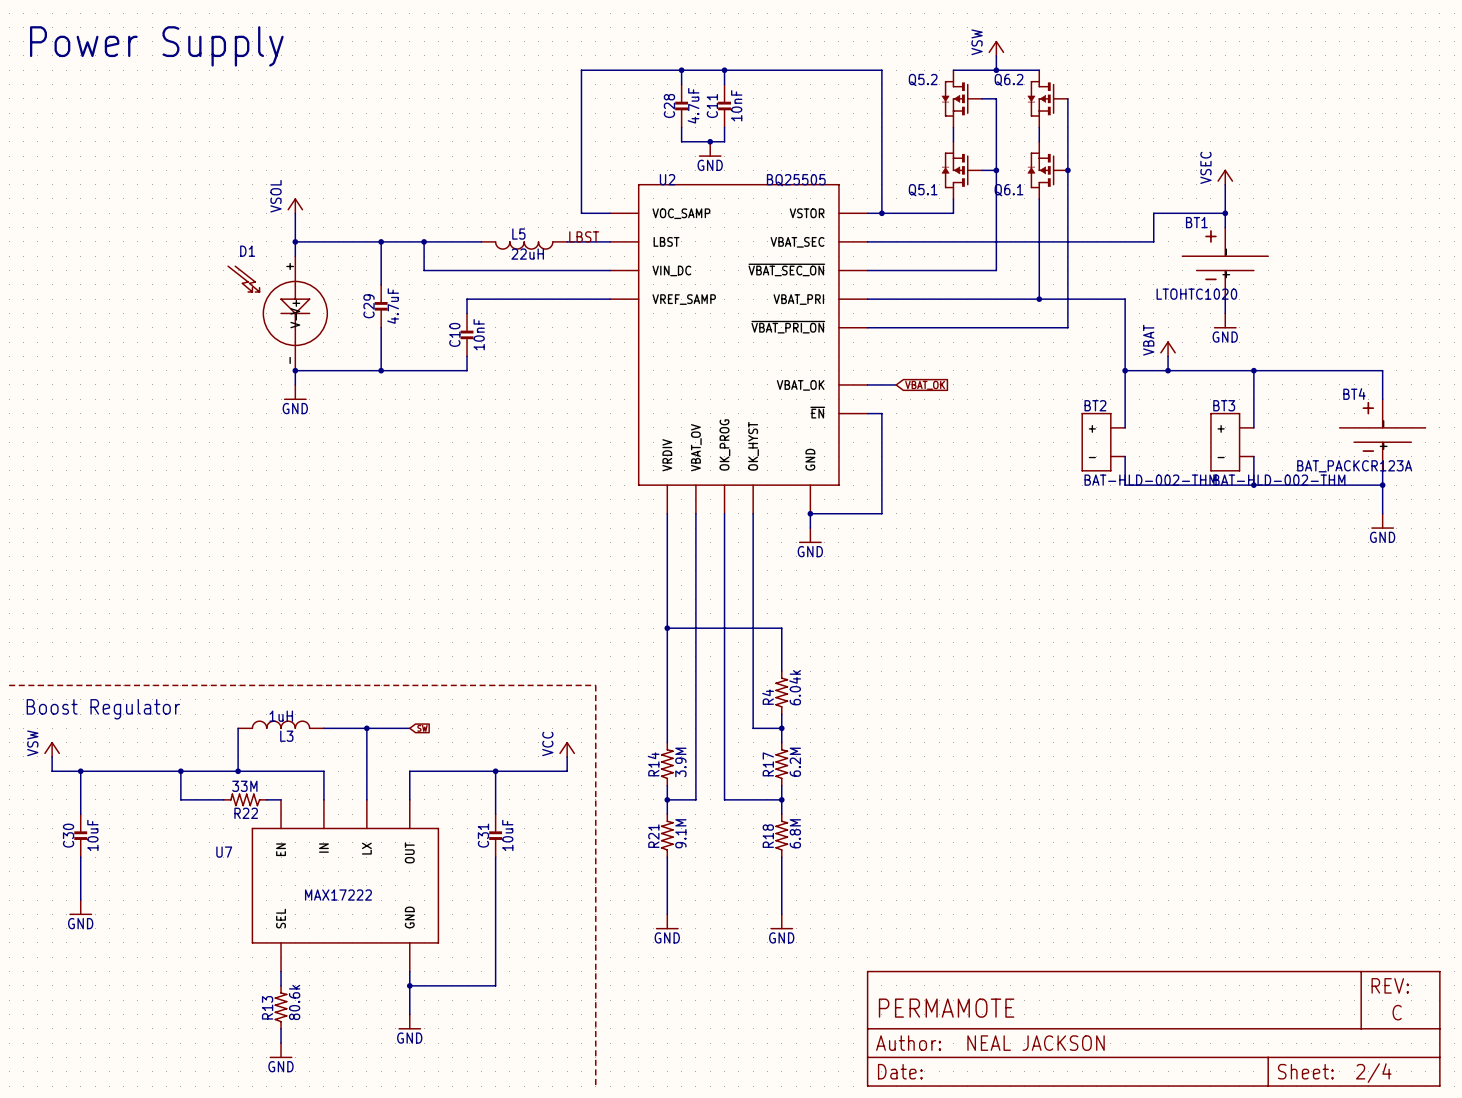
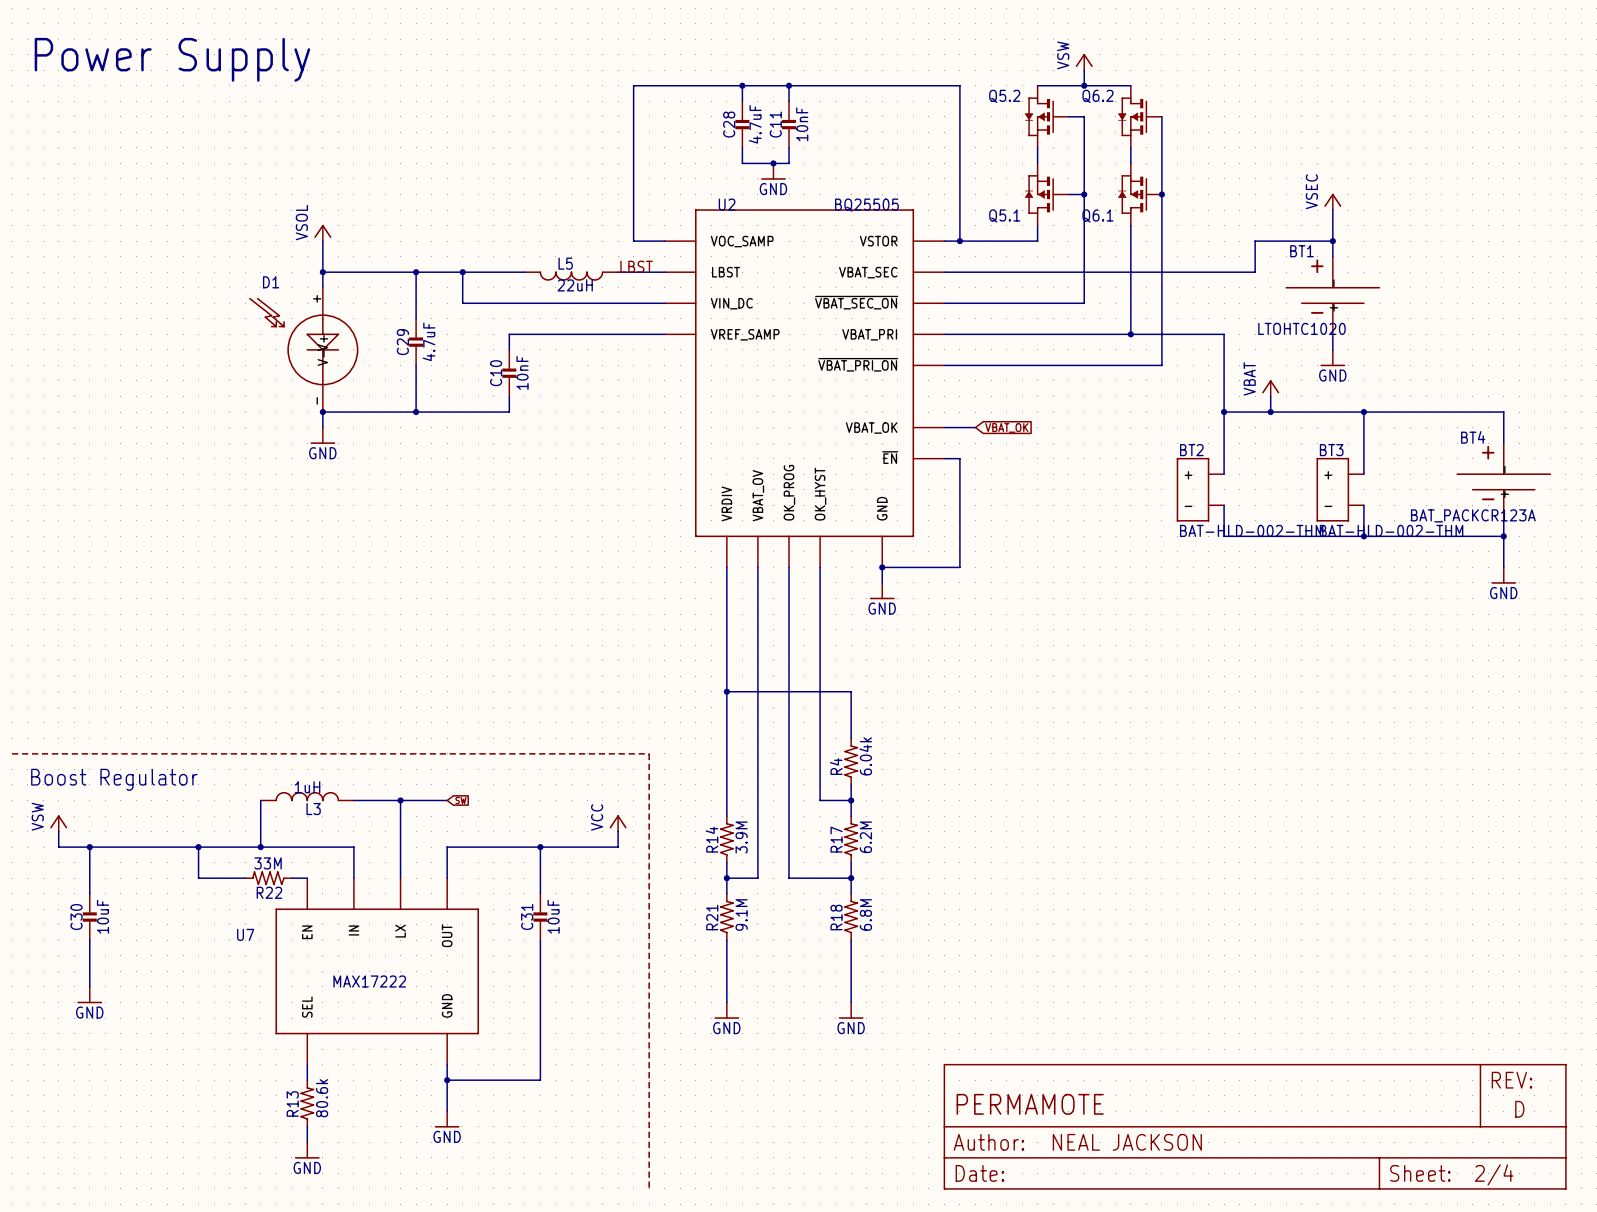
part text: C (1397, 1012) -> D (1519, 1109)

